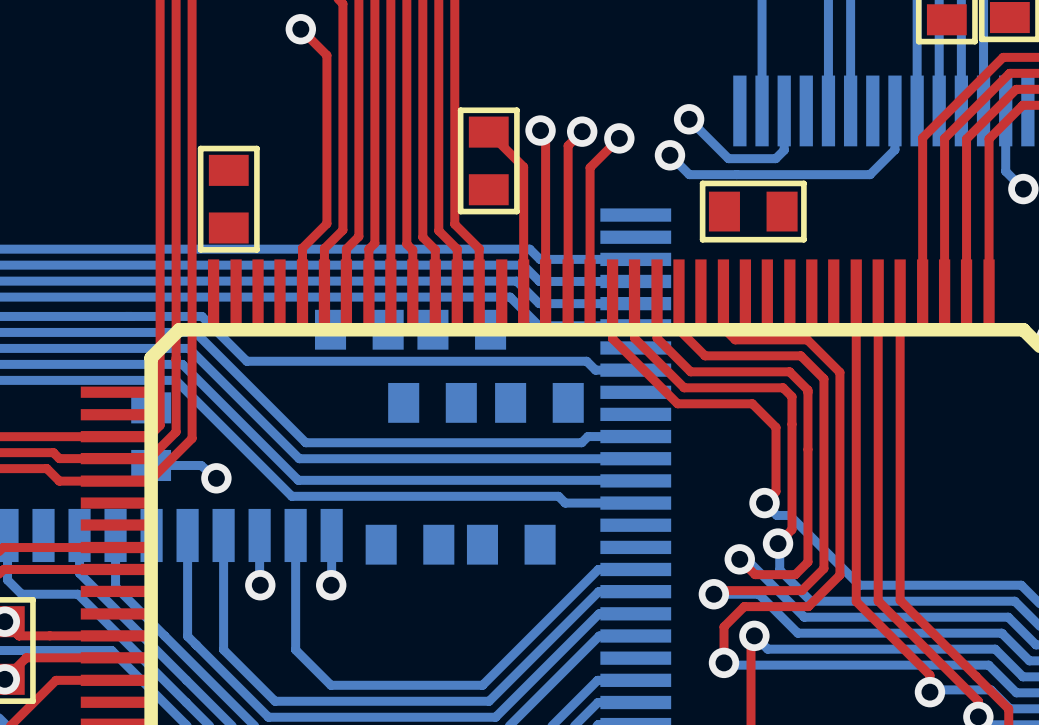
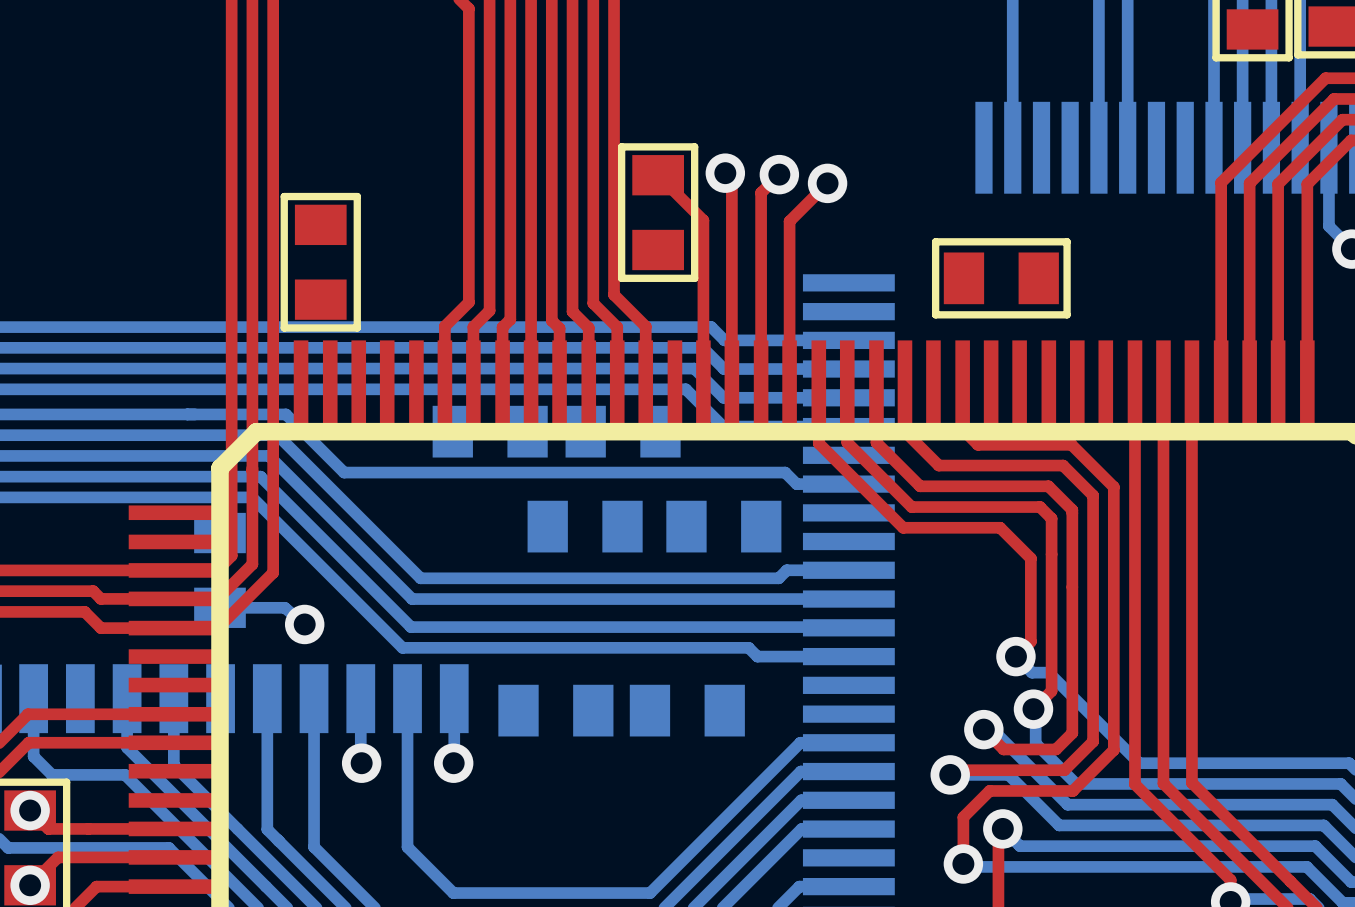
top track: (300, 29) (326, 55) (326, 223) (302, 248) (302, 293) -> none
via: (300, 29) -> none
bottom track: (784, 110) (784, 150) (775, 158) (728, 158) (689, 119) -> none
bottom track: (894, 110) (894, 149) (870, 174) (689, 174) (669, 155) -> none
via: (689, 119) -> none
via: (669, 155) -> none

